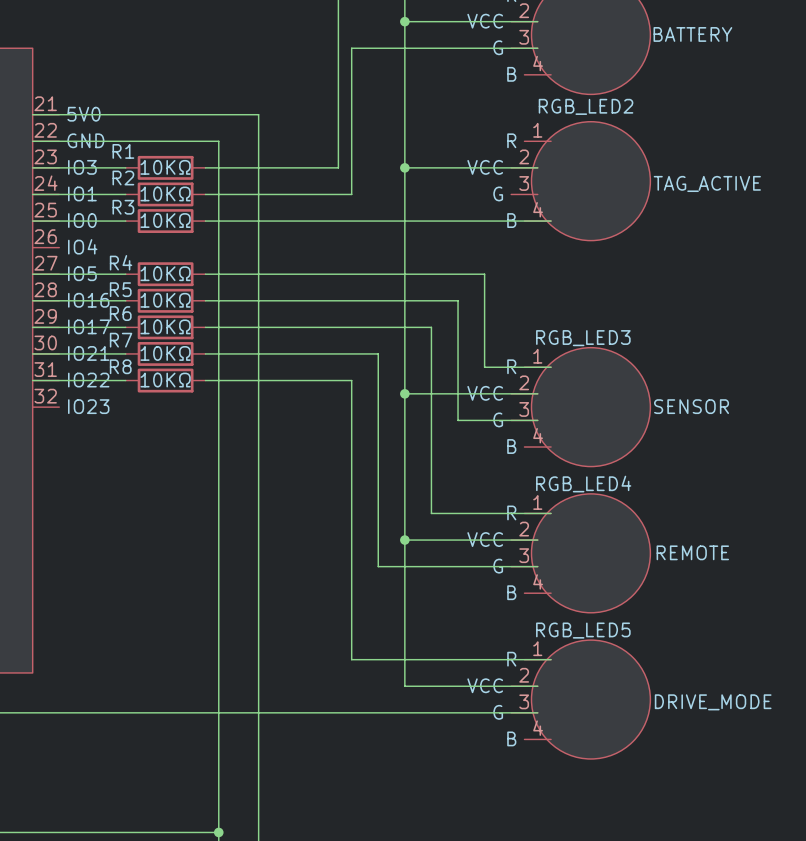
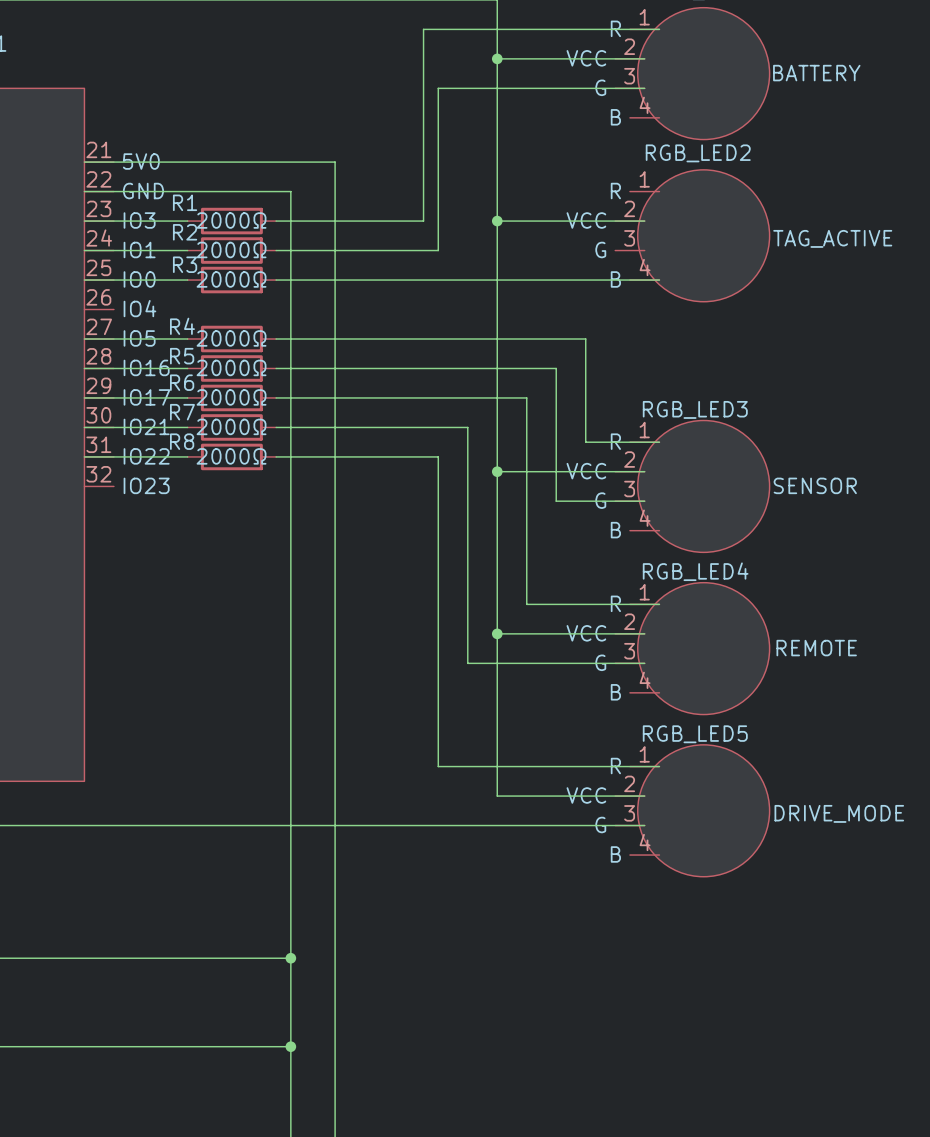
R1 value: 10KΩ (165, 167) -> 2000Ω (231, 220)
R2 value: 10KΩ (165, 193) -> 2000Ω (231, 249)
R3 value: 10KΩ (165, 220) -> 2000Ω (231, 279)
R4 value: 10KΩ (165, 273) -> 2000Ω (231, 338)
R5 value: 10KΩ (165, 300) -> 2000Ω (231, 367)
R6 value: 10KΩ (165, 326) -> 2000Ω (231, 397)
R7 value: 10KΩ (165, 353) -> 2000Ω (231, 426)
R8 value: 10KΩ (165, 380) -> 2000Ω (231, 456)

